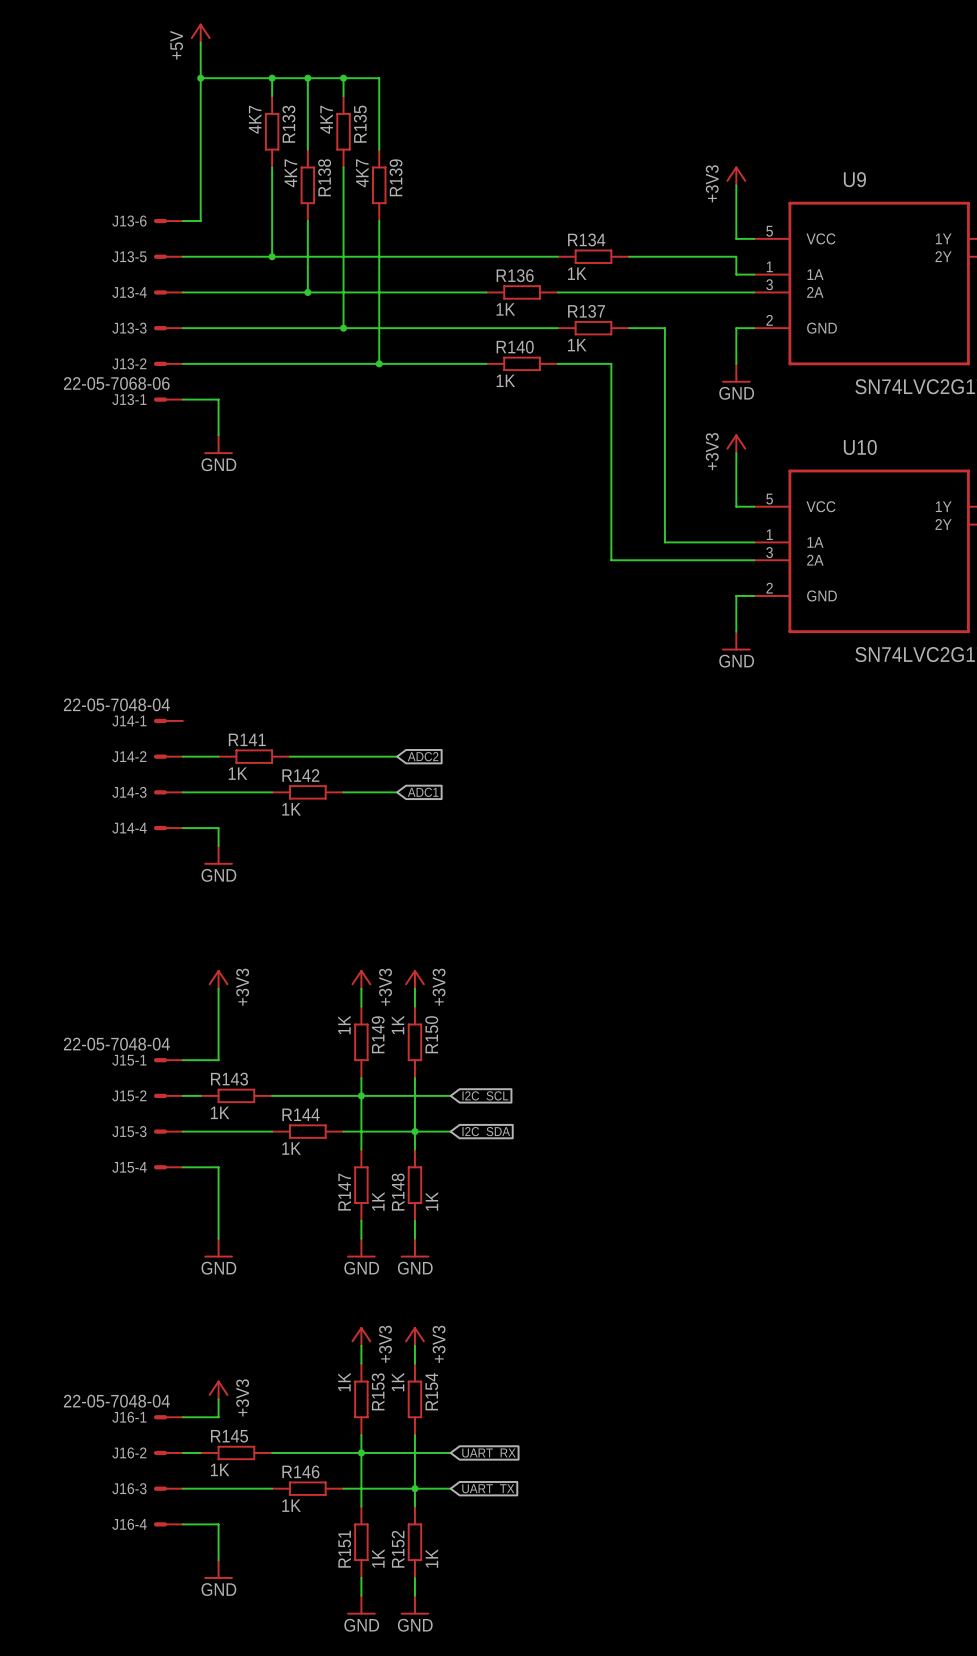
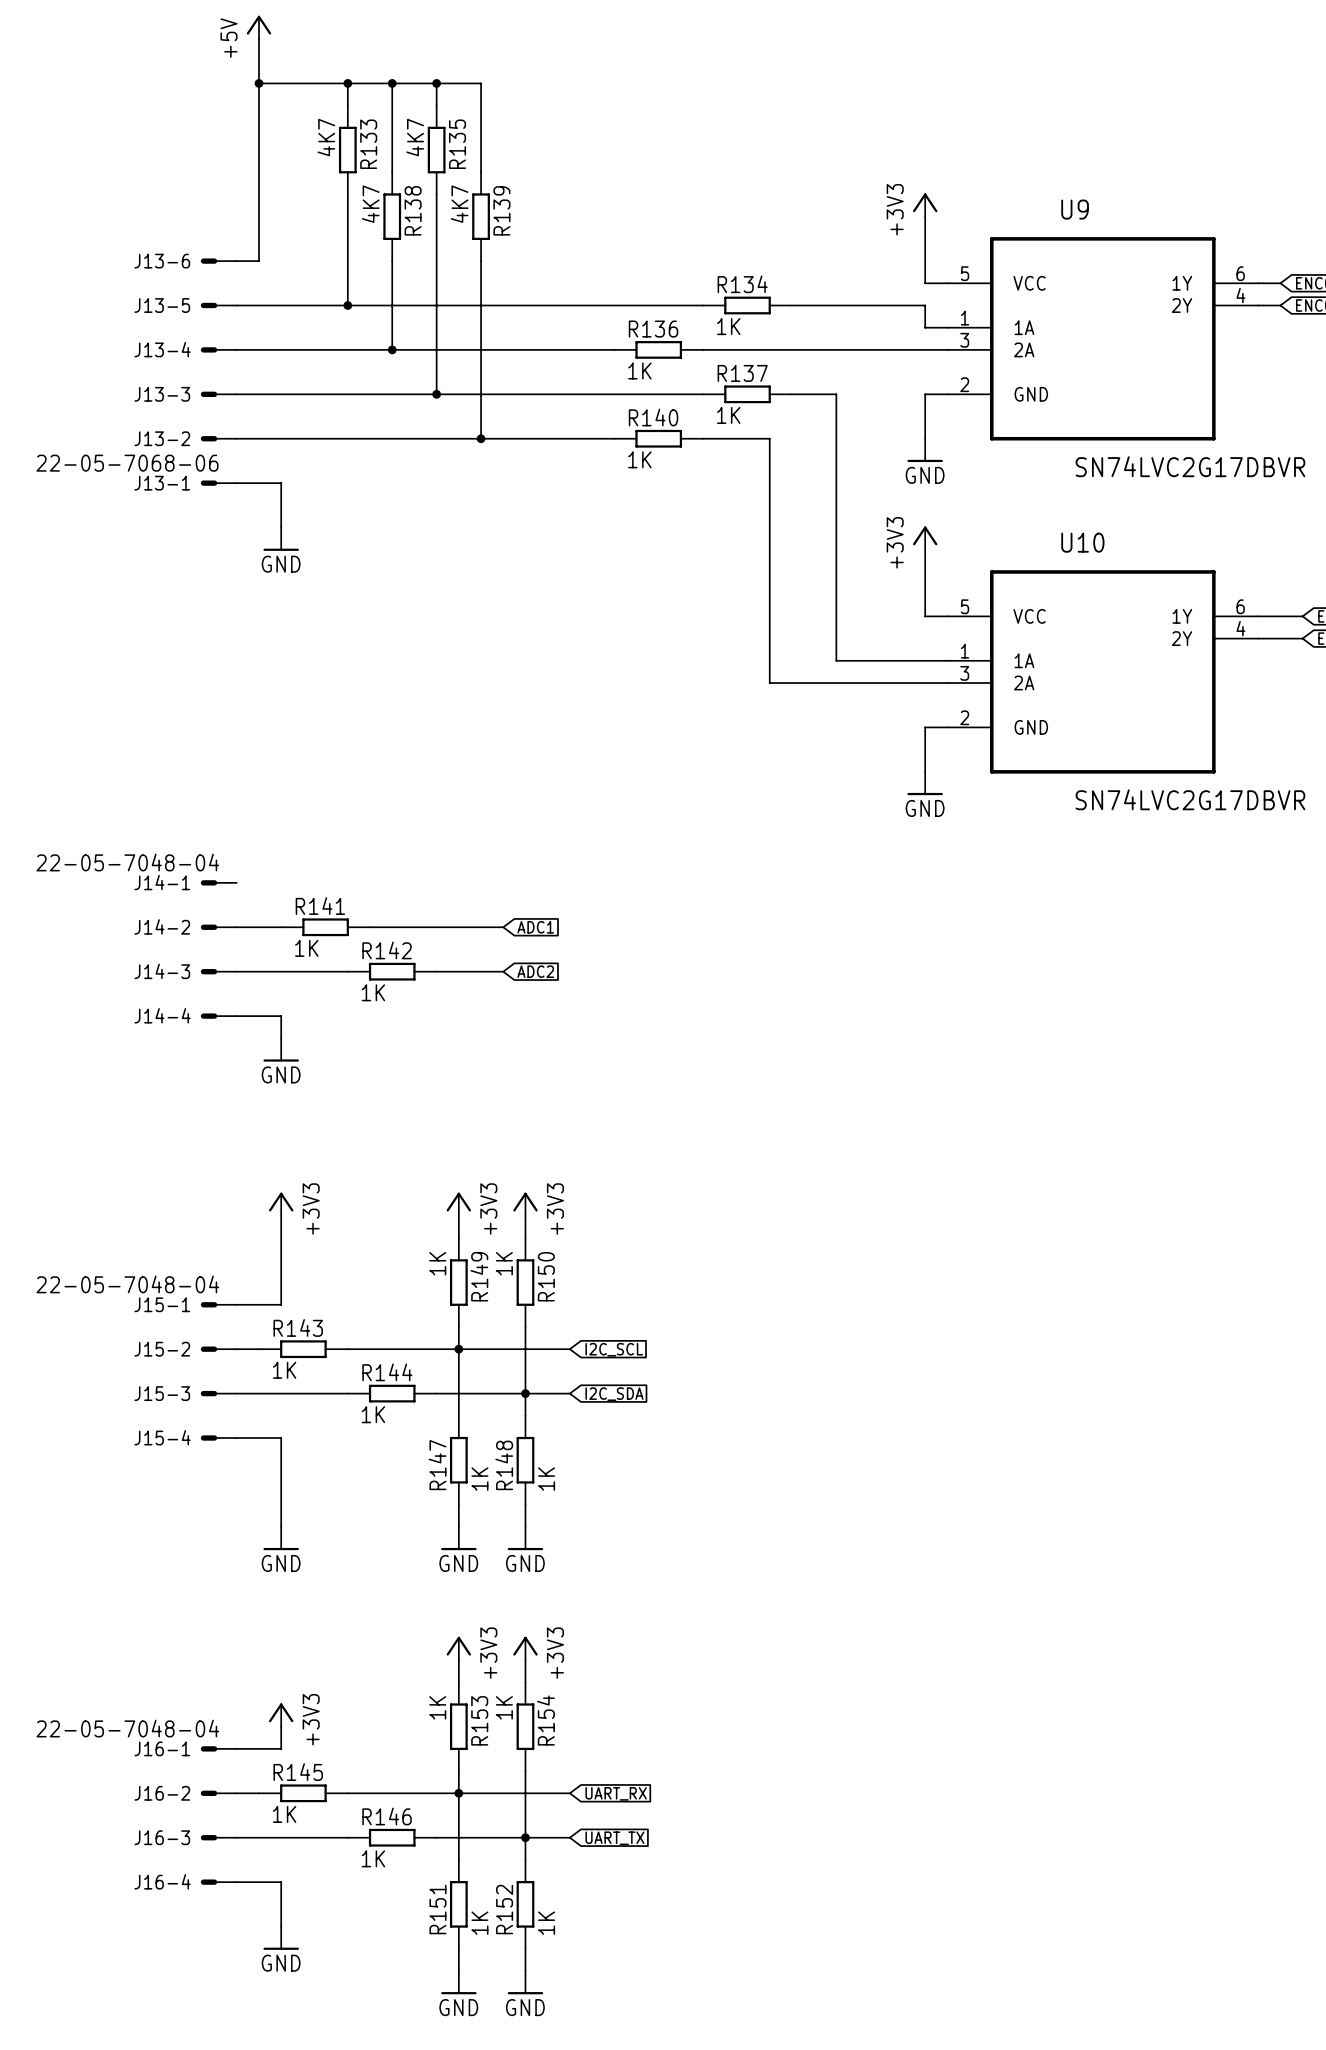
global label: ADC2 (423, 756) -> ADC1 (535, 927)
global label: ADC1 (423, 792) -> ADC2 (535, 971)

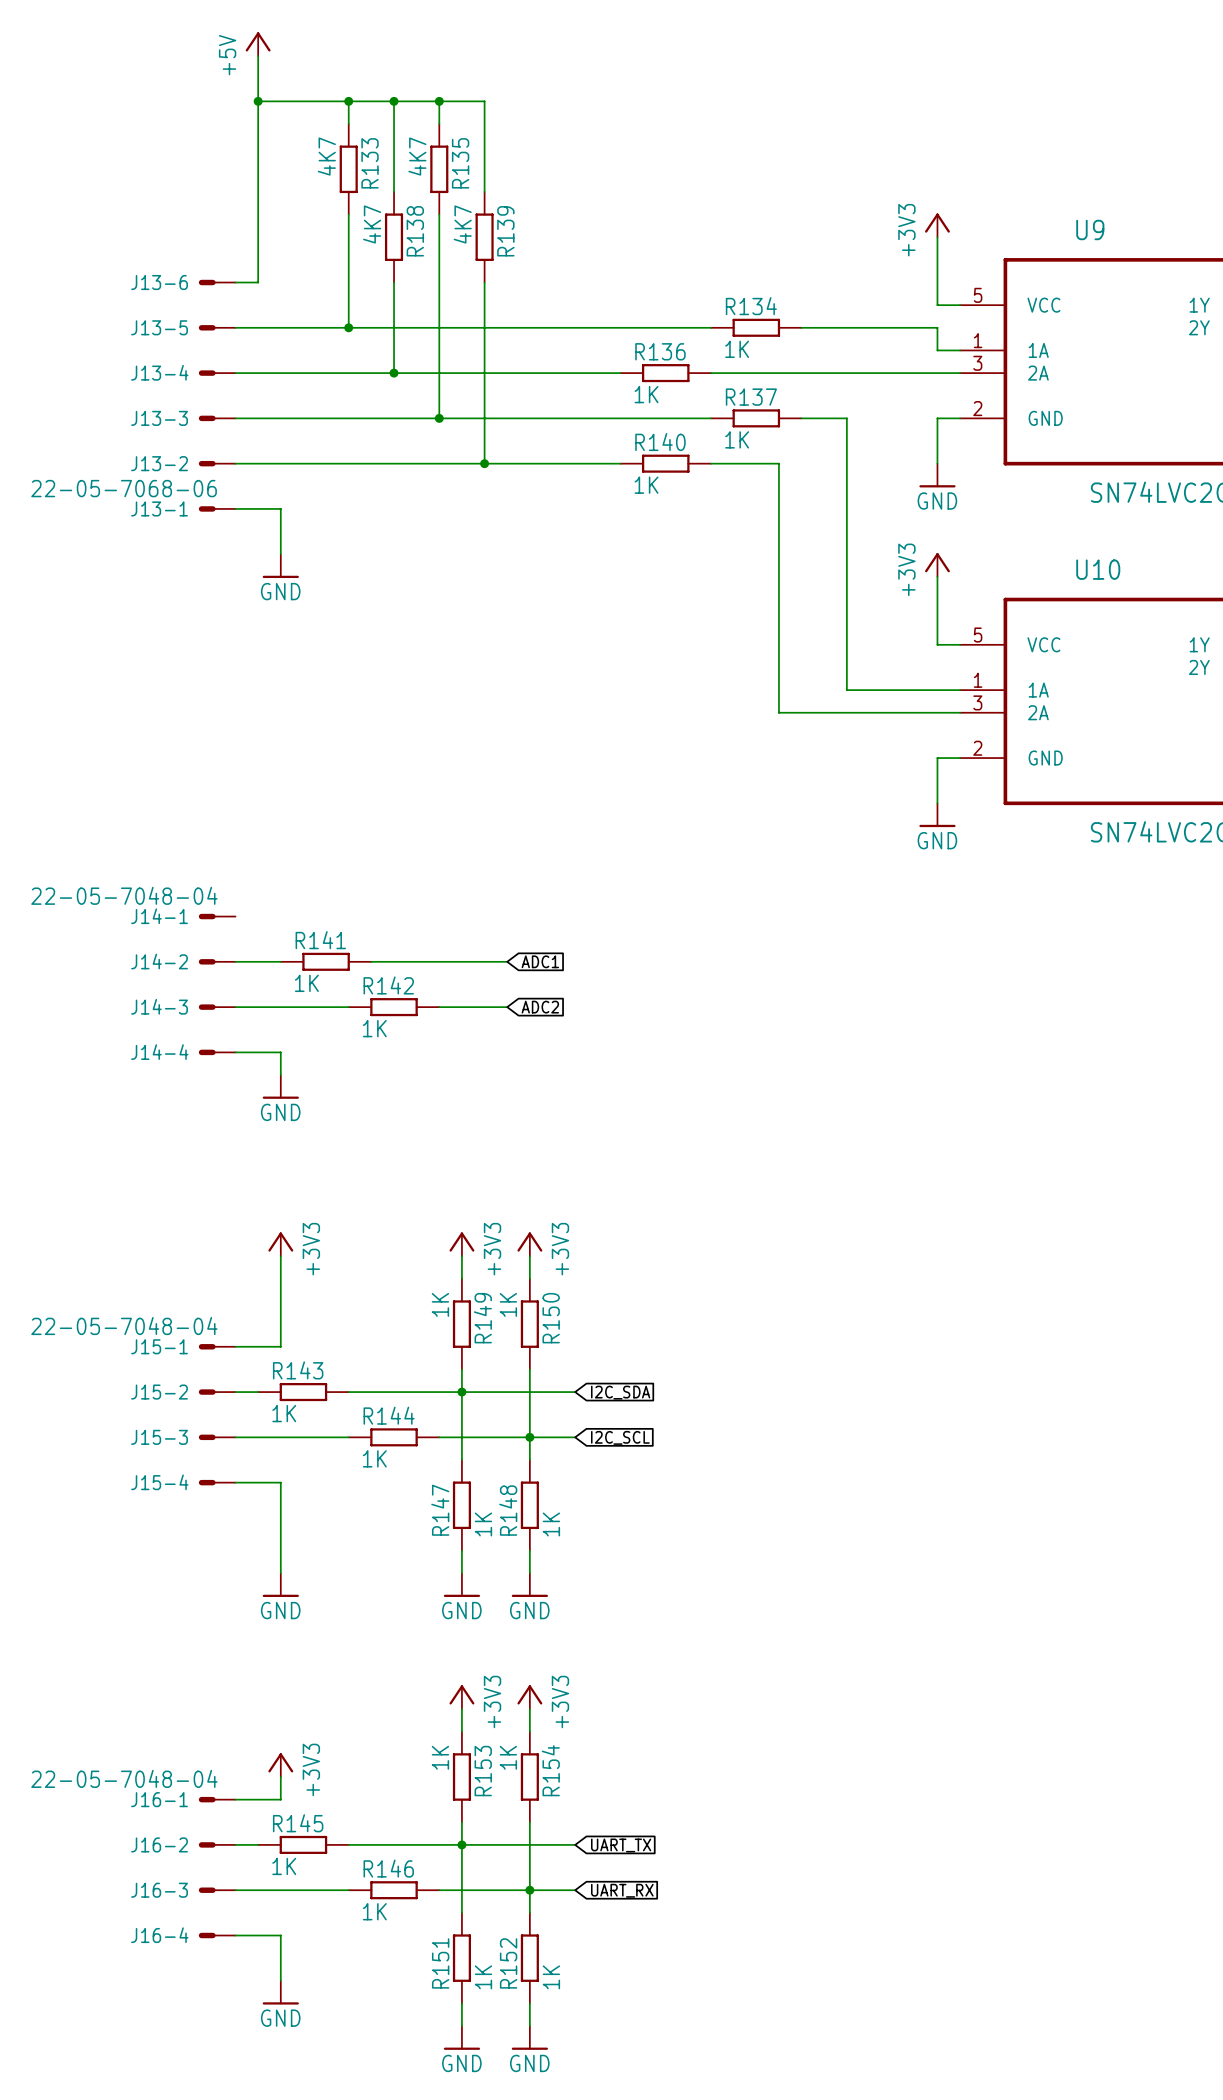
global label: I2C_SCL (614, 1349) -> I2C_SDA (620, 1392)
global label: I2C_SDA (614, 1394) -> I2C_SCL (620, 1437)
global label: UART_RX (616, 1793) -> UART_TX (621, 1845)
global label: UART_TX (614, 1838) -> UART_RX (622, 1890)

